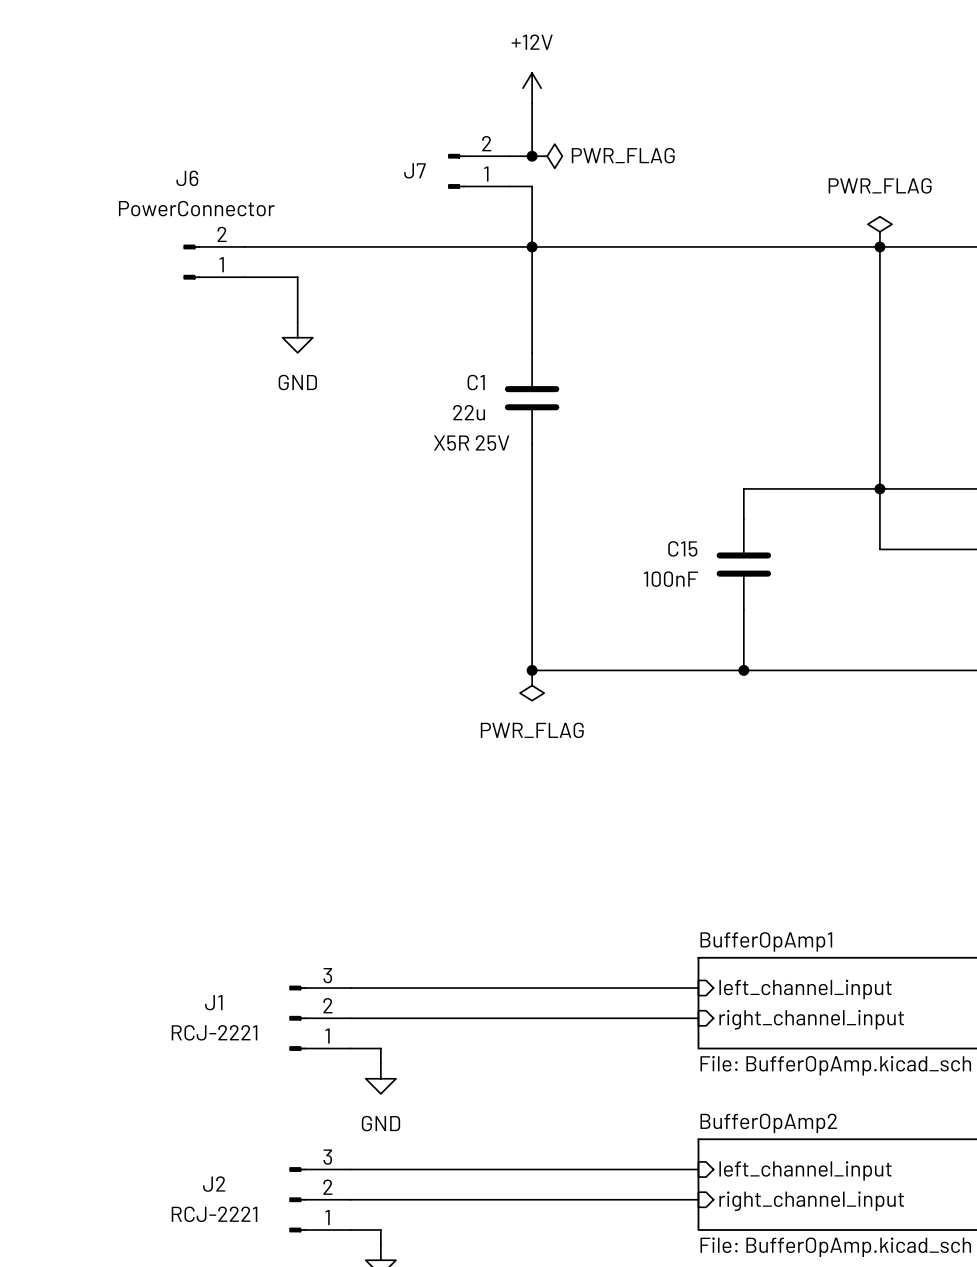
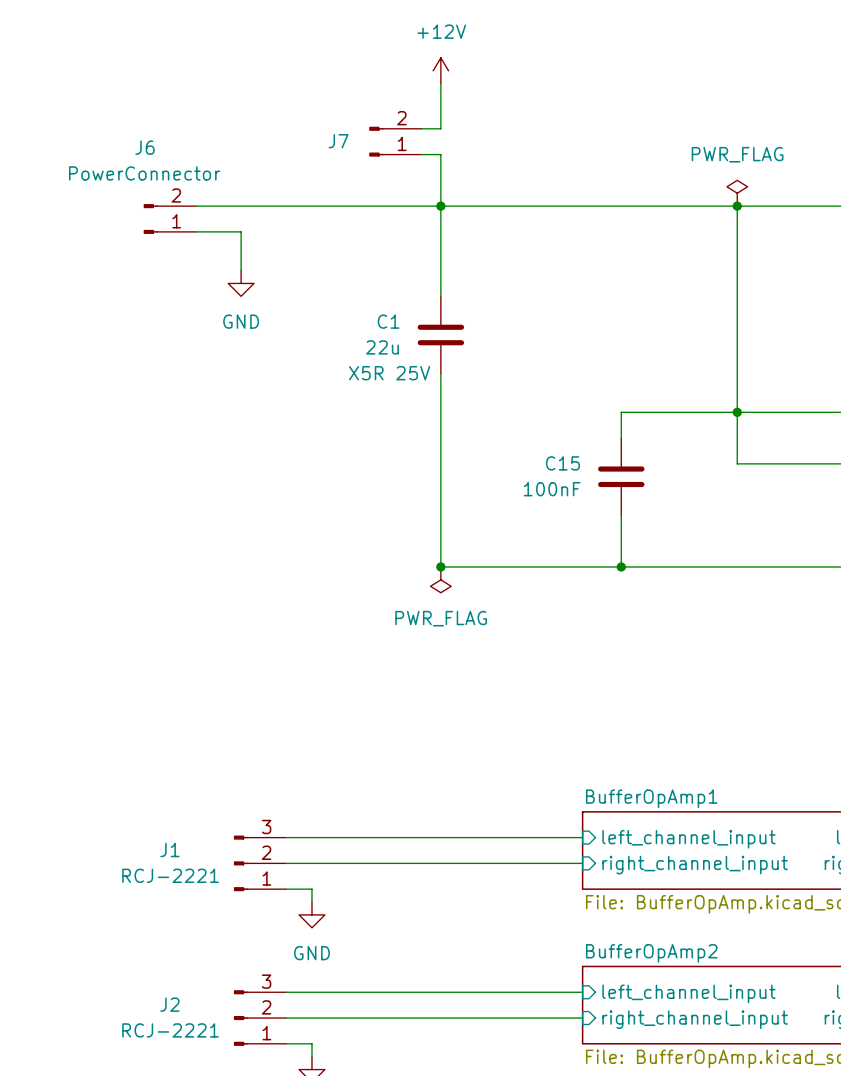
junction: (532, 156) -> none
power symbol: PWR_FLAG (547, 156) -> none

